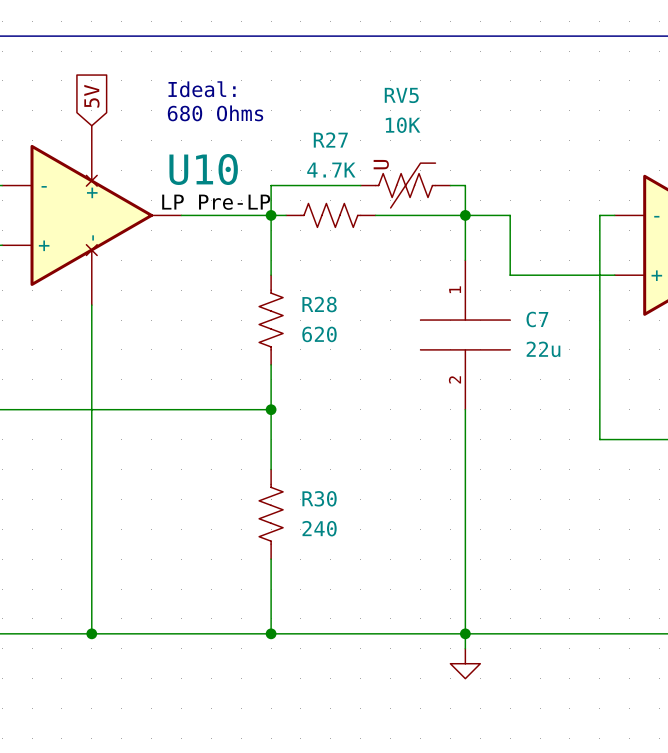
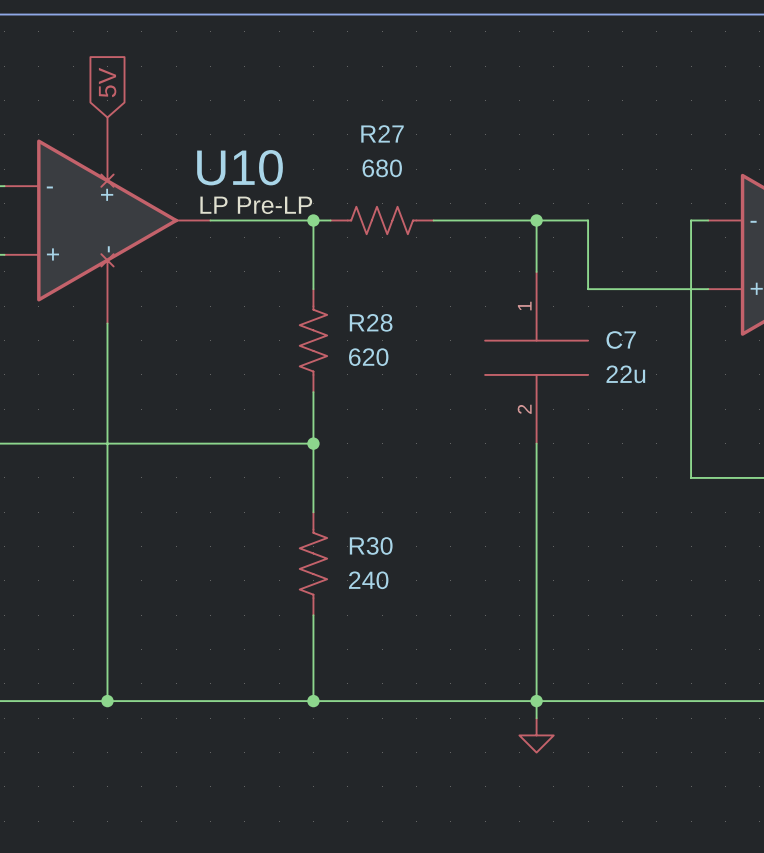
text: Ideal: (202, 89) -> none
text: 680 Ohms (215, 113) -> none
R27 value: 4.7K (331, 170) -> 680 (382, 168)
wire: (360, 185) (271, 185) (271, 215) -> none
RV5: 10K (405, 185) -> none
wire: (450, 185) (465, 185) (465, 215) -> none

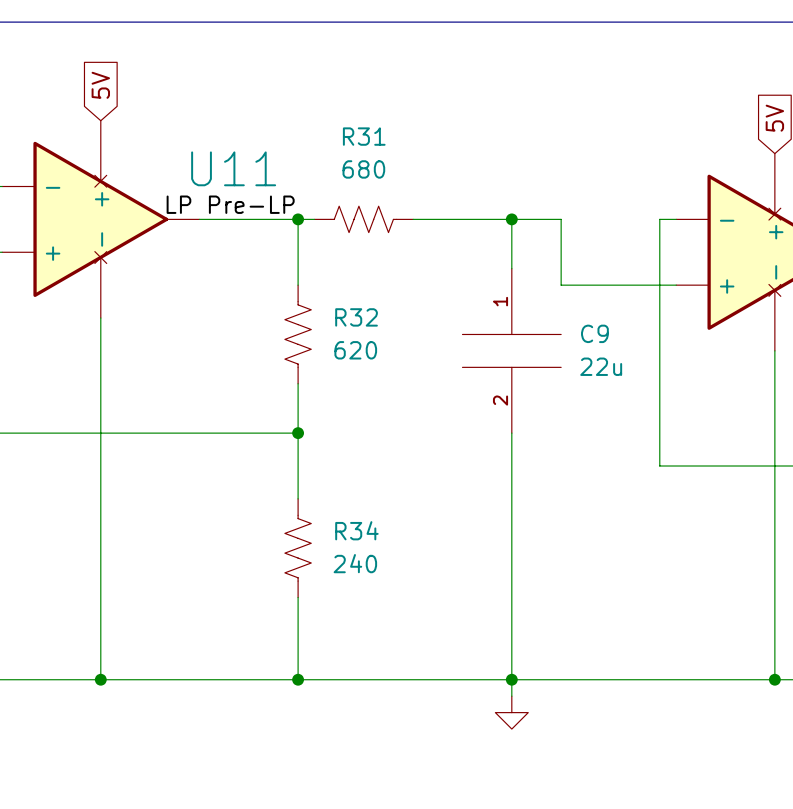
R27 name: R27 (382, 133) -> R31 (364, 136)
U10 name: U10 (240, 167) -> U11 (233, 168)
R28 name: R28 (371, 322) -> R32 (356, 317)
C7 name: C7 (621, 339) -> C9 (594, 333)
R30 name: R30 (371, 545) -> R34 (356, 530)

